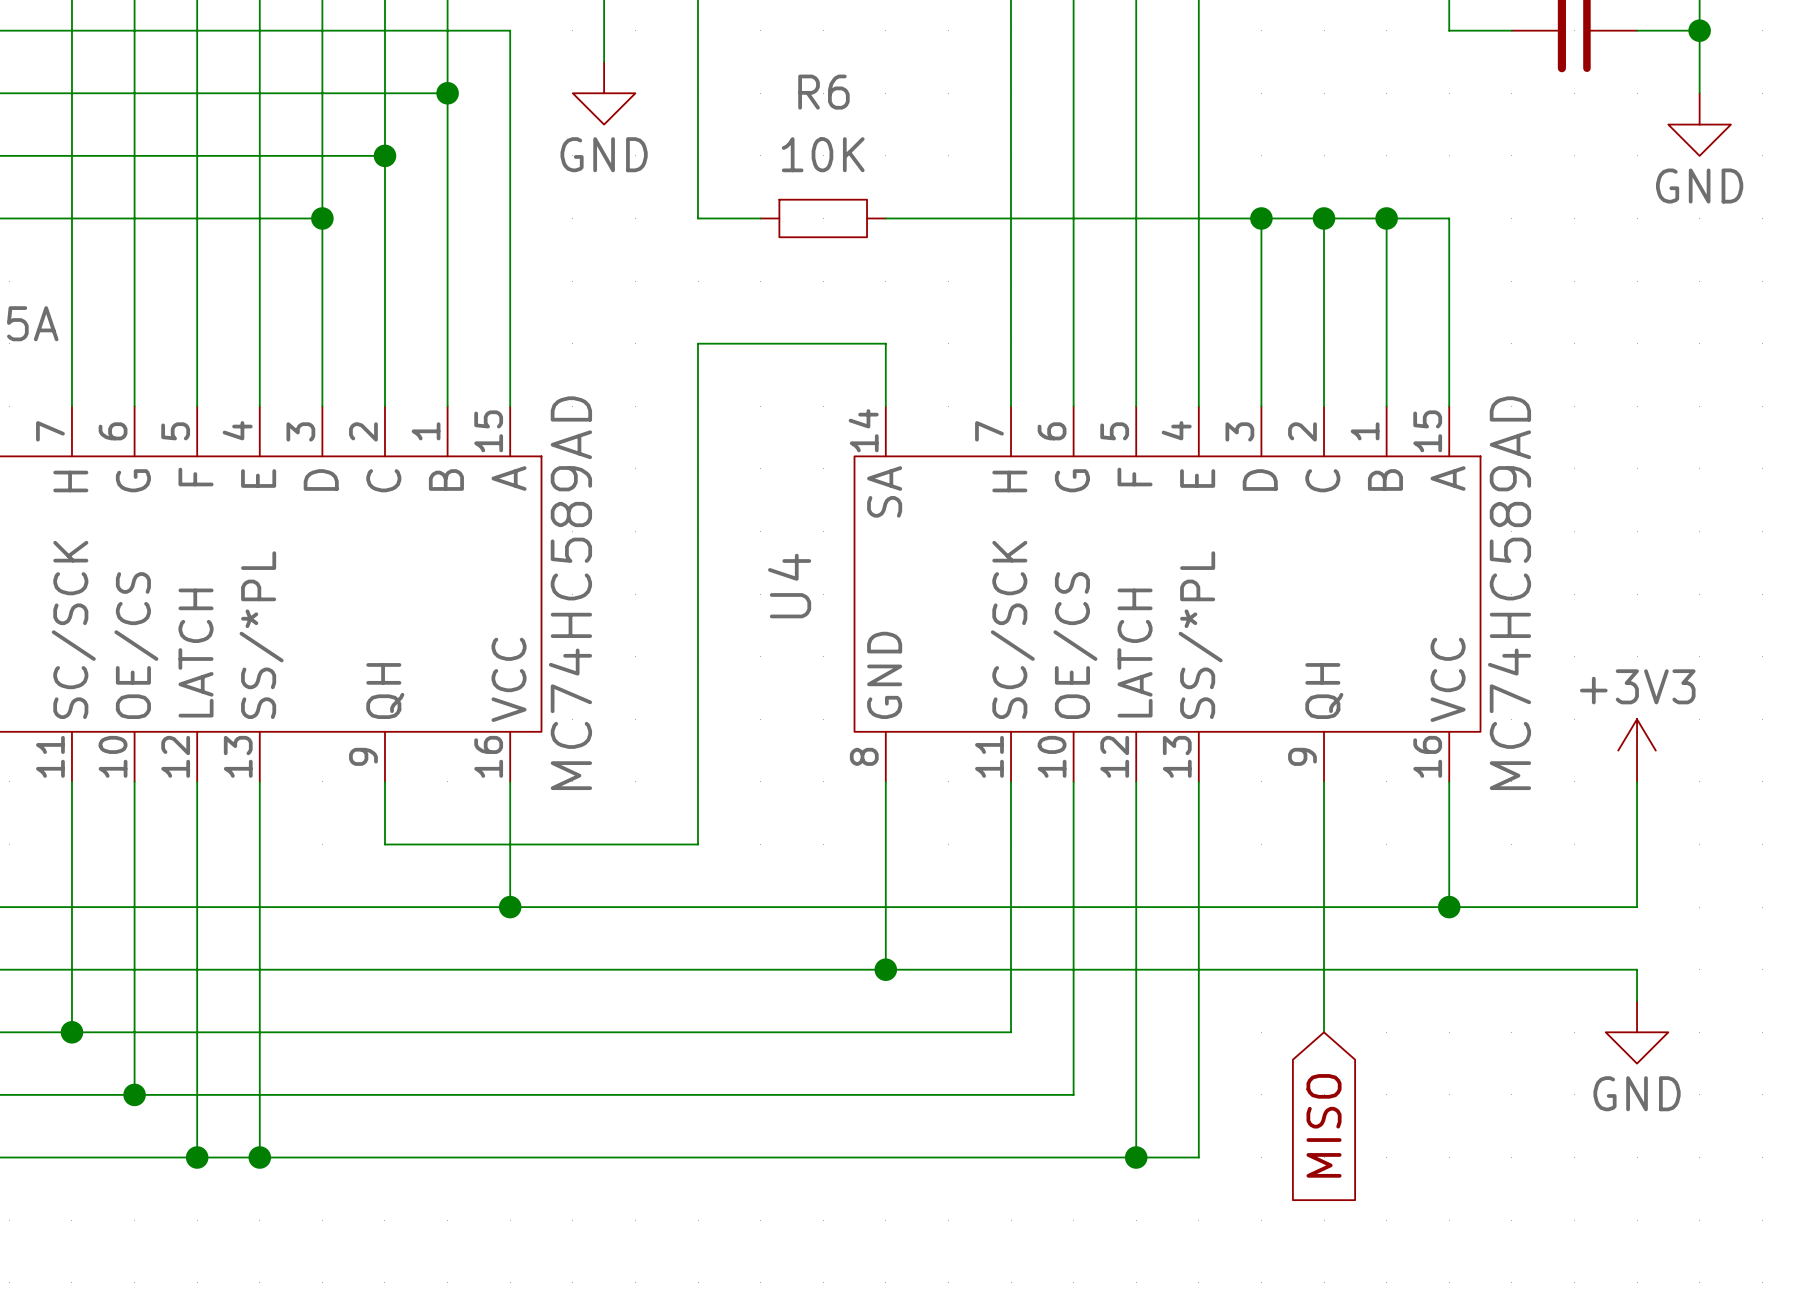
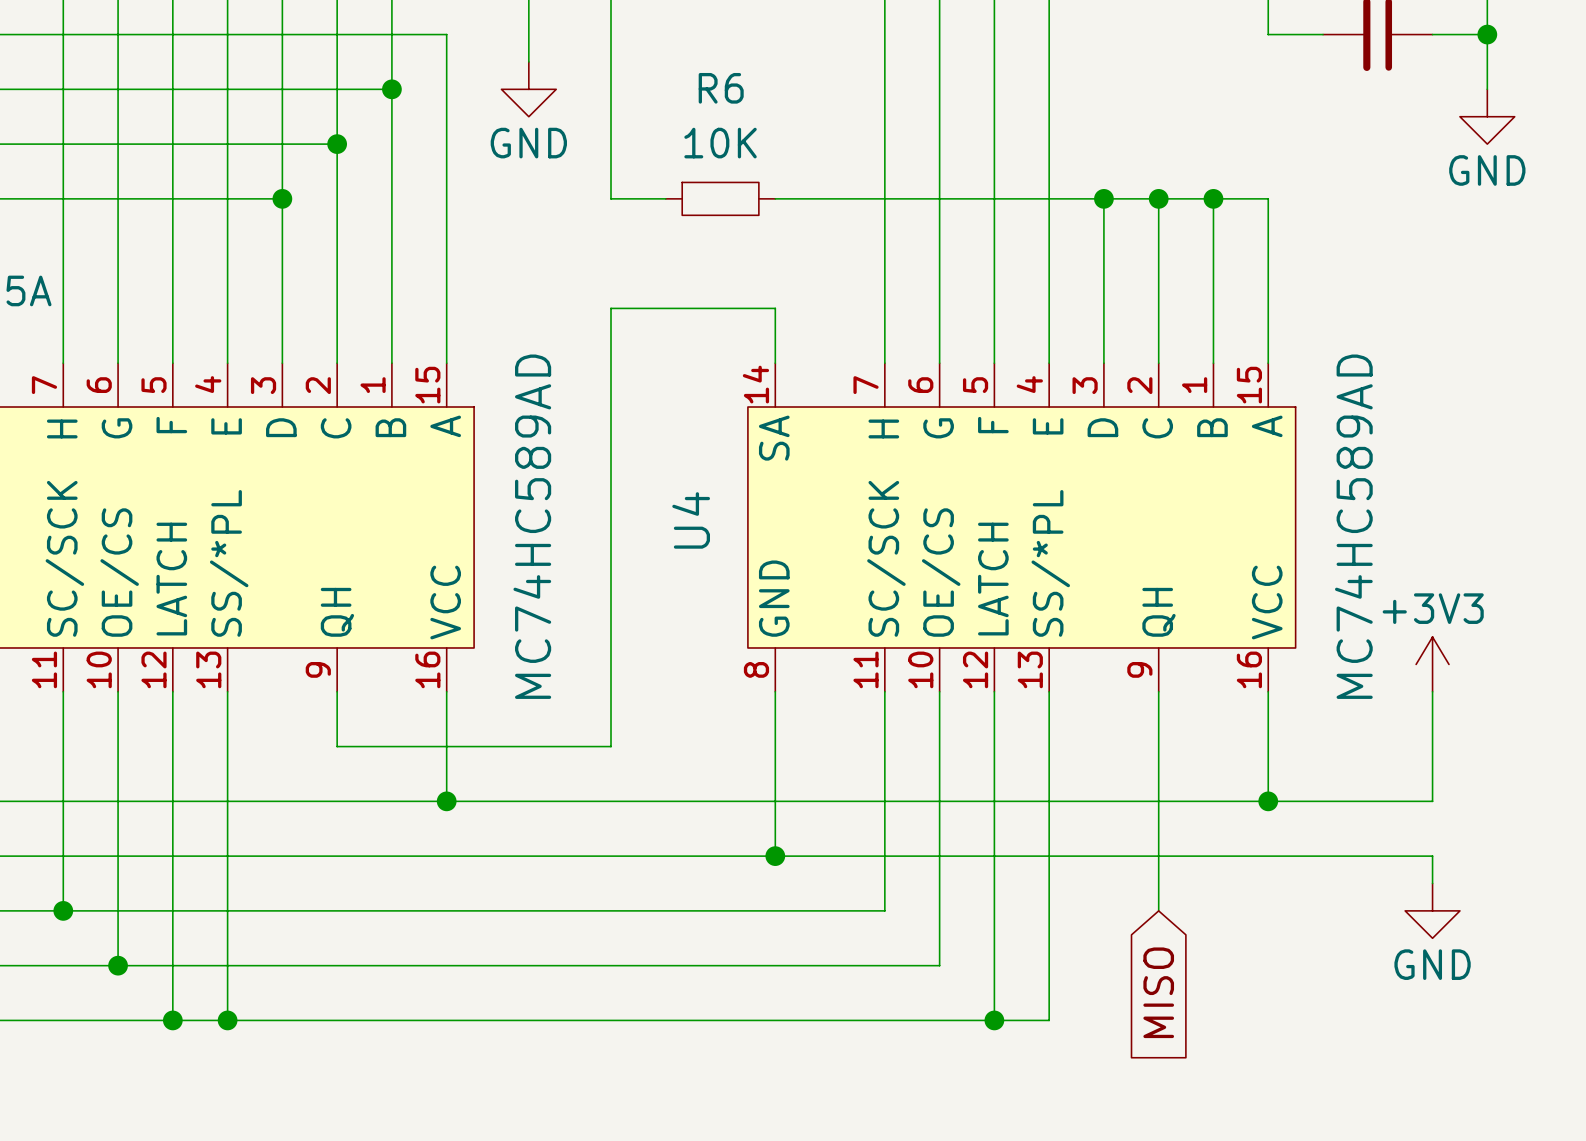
part value position: MC74HC589AD (570, 593) -> MC74HC589AD (532, 526)
U4 value position: MC74HC589AD (1509, 593) -> MC74HC589AD (1353, 526)

